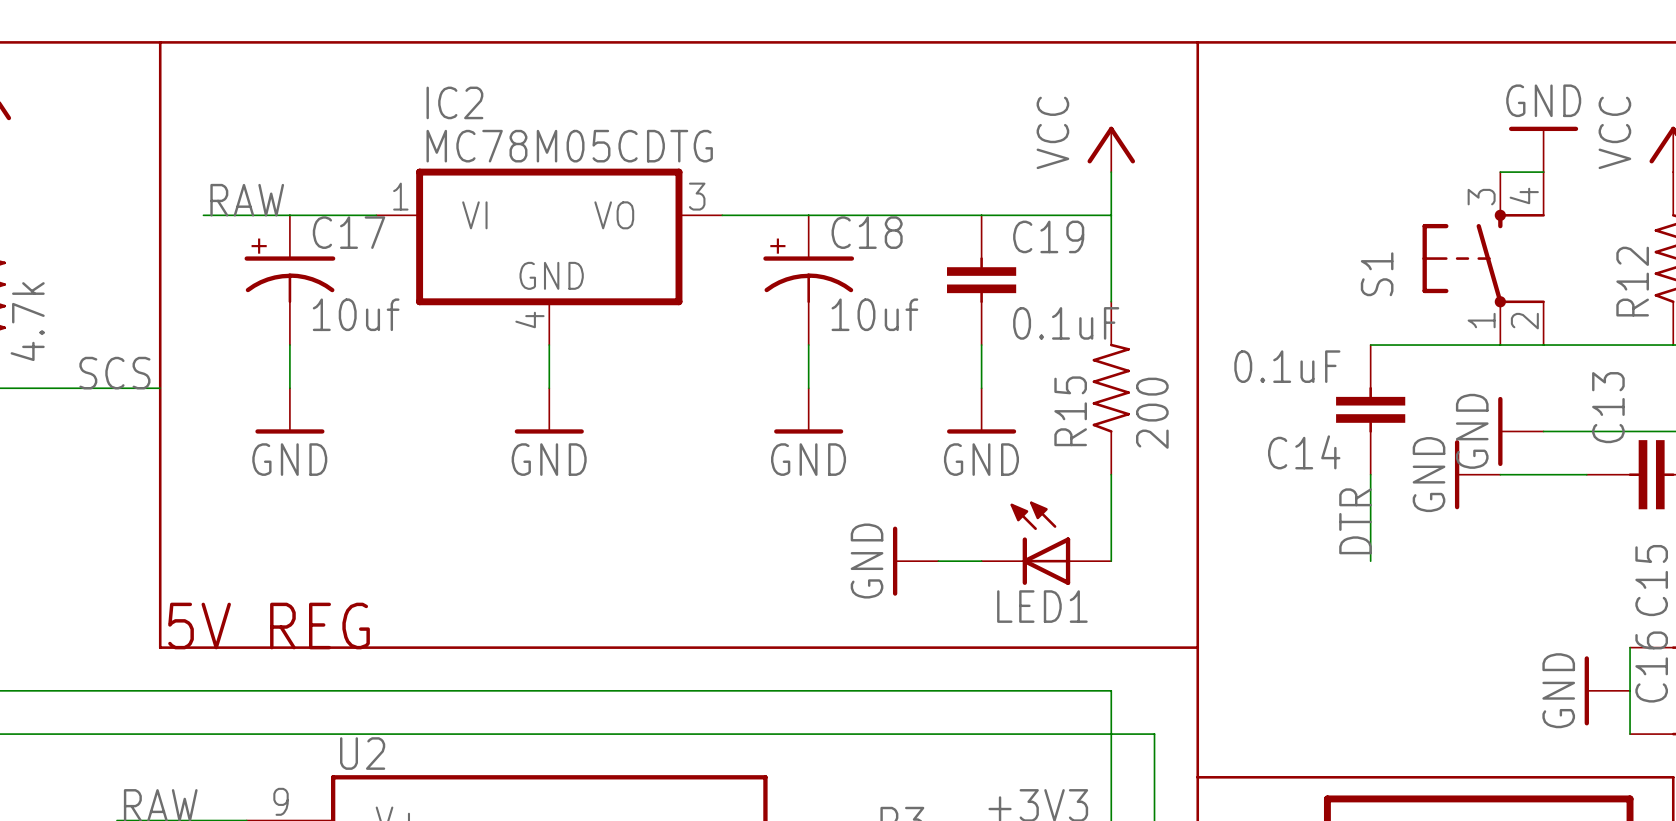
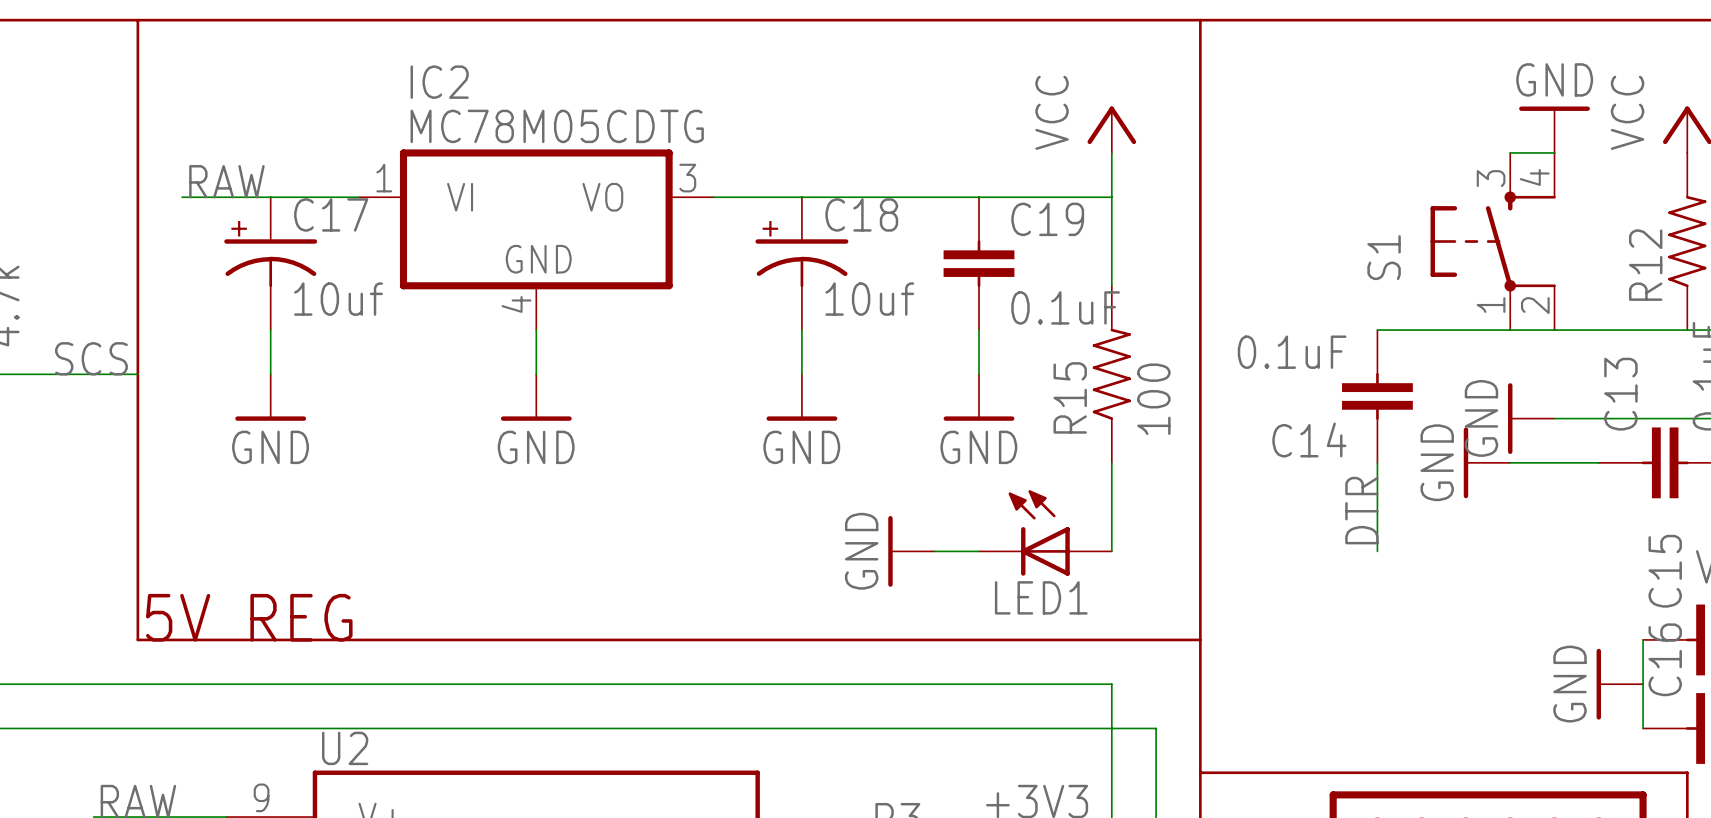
R15 value: 200 (1152, 413) -> 100 (1153, 399)

